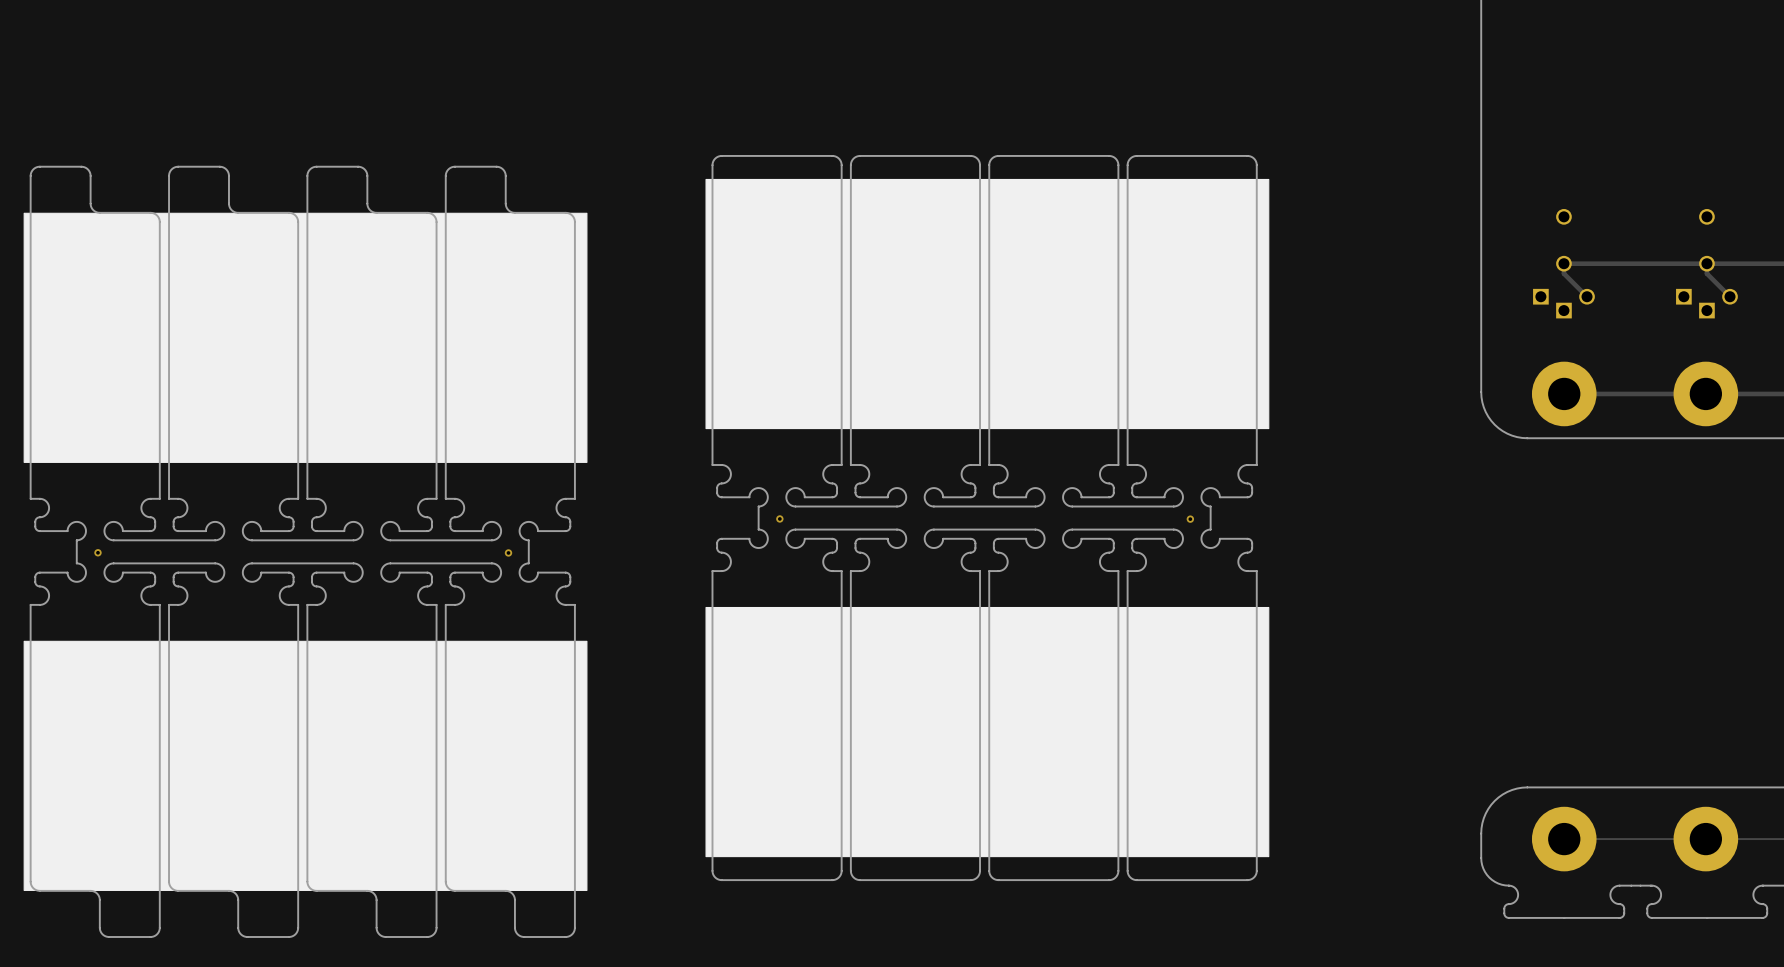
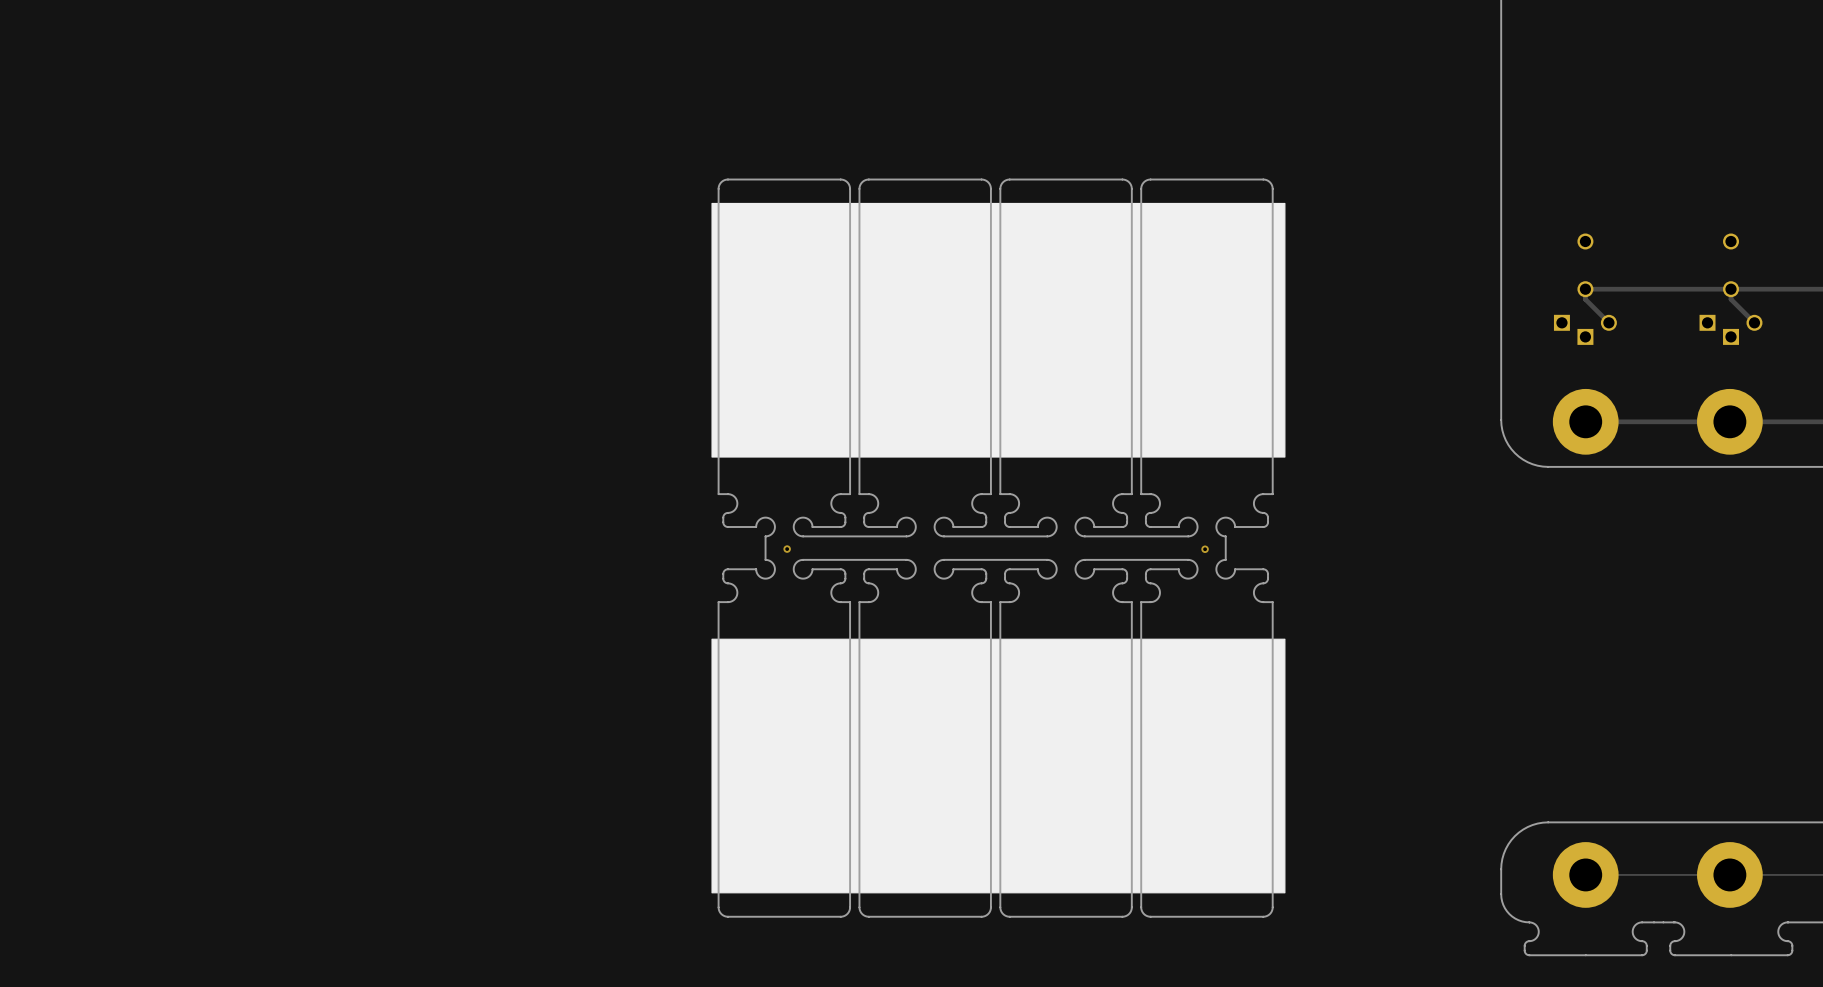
board edge: (496, 166) (452, 166) (447, 170) (445, 175) (445, 498) (458, 499) (463, 505) (461, 514) (451, 519) (451, 529) (482, 531) (486, 523) (494, 522) (499, 525) (501, 531) (498, 537) (491, 540) (390, 540) (385, 538) (381, 534) (382, 526) (388, 522) (396, 524) (399, 531) (427, 531) (431, 527) (430, 519) (421, 515) (418, 508) (422, 500) (436, 498) (436, 221) (433, 215) (428, 212) (371, 211) (367, 204) (367, 173) (363, 168) (358, 166) (315, 166) (310, 169) (307, 174) (307, 498) (319, 499) (325, 505) (323, 514) (312, 520) (313, 530) (344, 531) (347, 524) (355, 522) (361, 527) (361, 536) (353, 540) (252, 540) (243, 535) (244, 526) (250, 522) (258, 524) (261, 531) (289, 531) (293, 527) (292, 519) (282, 514) (279, 508) (284, 499) (298, 498) (297, 220) (294, 214) (289, 212) (234, 211) (229, 205) (228, 174) (225, 168) (219, 166) (178, 166) (171, 169) (169, 175) (169, 498) (181, 499) (187, 505) (185, 514) (173, 520) (173, 527) (175, 530) (205, 531) (208, 524) (215, 521) (222, 525) (224, 532) (221, 537) (215, 540) (113, 540) (108, 538) (104, 534) (104, 528) (112, 522) (119, 524) (122, 531) (153, 530) (154, 520) (143, 514) (141, 505) (147, 499) (159, 498) (159, 220) (156, 214) (151, 212) (94, 211) (90, 204) (90, 173) (84, 167) (38, 166) (31, 171) (30, 498) (43, 499) (48, 505) (46, 514) (35, 520) (35, 527) (37, 530) (67, 531) (69, 524) (76, 521) (84, 525) (85, 535) (76, 540) (76, 563) (83, 565) (85, 572) (83, 579) (77, 581) (70, 579) (67, 572) (39, 572) (35, 576) (36, 584) (45, 588) (49, 595) (44, 603) (30, 604) (30, 882) (33, 888) (38, 890) (90, 890) (96, 892) (99, 899) (99, 928) (104, 935) (151, 936) (157, 933) (159, 927) (159, 604) (147, 604) (141, 597) (143, 589) (154, 584) (153, 573) (122, 572) (119, 579) (111, 581) (105, 577) (104, 570) (108, 565) (113, 563) (215, 563) (220, 565) (223, 569) (223, 577) (216, 581) (209, 579) (205, 572) (177, 572) (173, 576) (174, 584) (184, 588) (187, 595) (182, 603) (169, 604) (169, 882) (171, 888) (177, 890) (233, 892) (238, 899) (238, 930) (241, 935) (247, 936) (289, 936) (295, 934) (298, 928) (298, 604) (285, 604) (279, 597) (282, 589) (293, 583) (291, 573) (261, 572) (258, 579) (250, 581) (243, 576) (244, 567) (252, 563) (353, 563) (361, 568) (361, 576) (355, 581) (347, 579) (344, 572) (316, 572) (312, 576) (312, 584) (322, 588) (325, 595) (321, 603) (307, 604) (307, 883) (310, 888) (315, 890) (371, 891) (376, 898) (376, 928) (380, 935) (385, 936) (427, 937) (433, 934) (436, 927) (436, 604) (423, 604) (418, 598) (420, 589) (431, 583) (431, 576) (429, 573) (399, 572) (396, 579) (390, 581) (383, 578) (381, 570) (385, 565) (390, 563) (491, 563) (497, 565) (500, 574) (498, 579) (493, 581) (485, 579) (482, 572) (452, 573) (450, 583) (461, 589) (463, 598) (458, 604) (445, 604) (446, 883) (449, 888) (453, 890) (510, 892) (514, 899) (515, 930) (520, 936) (566, 936) (574, 931) (574, 604) (562, 604) (556, 598) (559, 589) (569, 583) (570, 576) (568, 573) (538, 572) (535, 578) (529, 581) (521, 578) (520, 568) (528, 563) (528, 540) (521, 537) (519, 530) (522, 524) (528, 521) (535, 524) (538, 531) (566, 531) (570, 527) (569, 519) (560, 515) (556, 508) (561, 500) (574, 498) (574, 221) (572, 215) (566, 212) (510, 211) (505, 204) (505, 173) (502, 168) (496, 166) -> none
drawing: [23, 212, 588, 463] -> none
via: (97, 552) -> none
via: (508, 552) -> none
drawing: [23, 640, 588, 891] -> none

